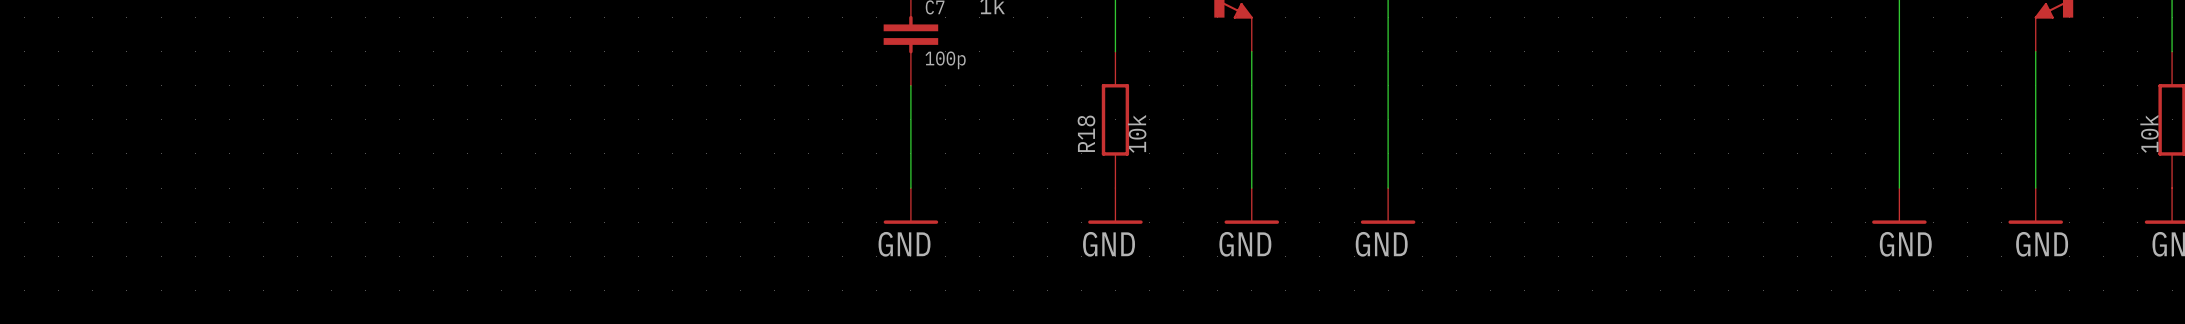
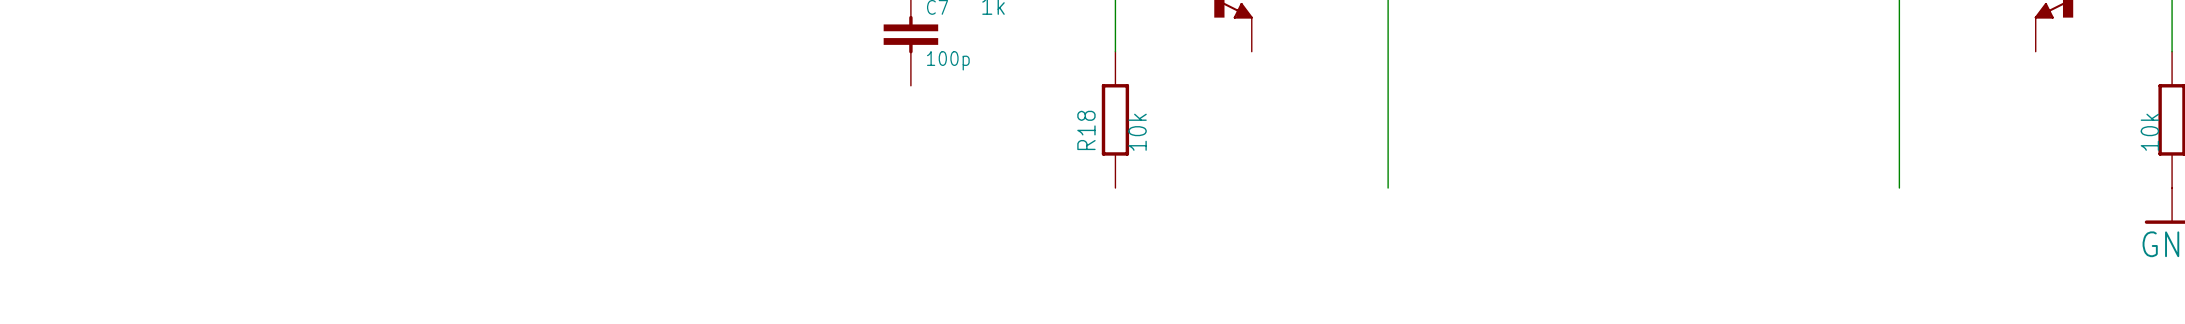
wire: (1251, 51) (1251, 188) -> none
wire: (2035, 51) (2035, 188) -> none
wire: (910, 85) (910, 188) -> none
power symbol: GND (910, 205) -> none
power symbol: GND (1115, 205) -> none
power symbol: GND (1251, 205) -> none
power symbol: GND (1388, 205) -> none
power symbol: GND (1899, 205) -> none
power symbol: GND (2035, 205) -> none

